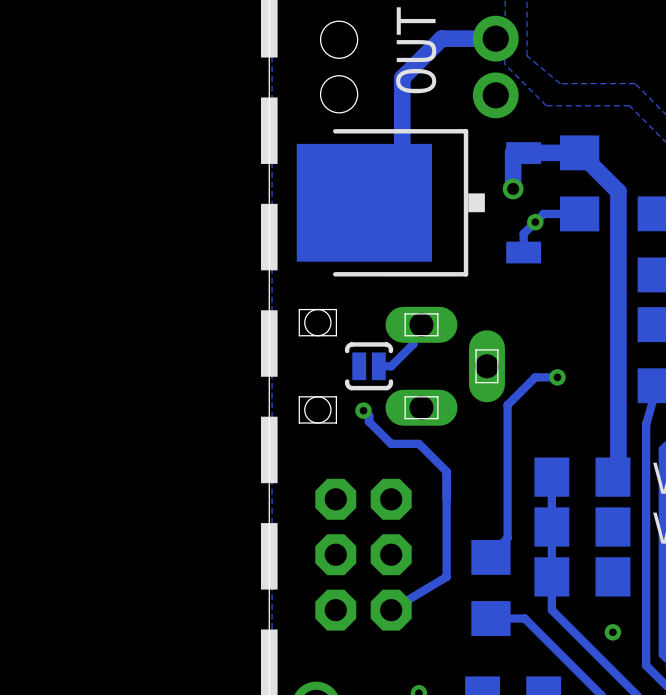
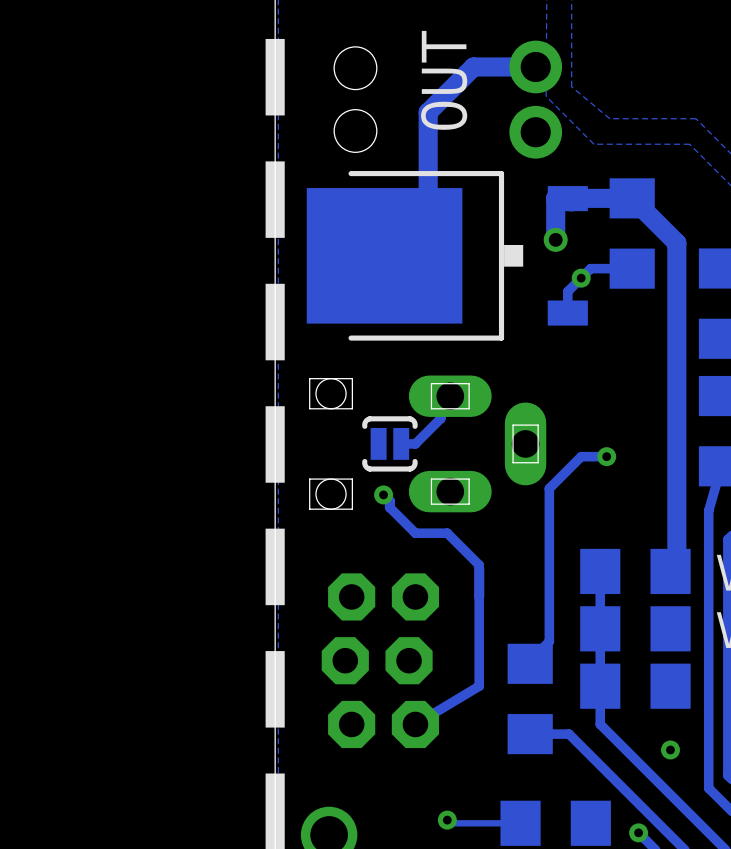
part footprint: [315, 478, 412, 631] -> [321, 573, 440, 749]

